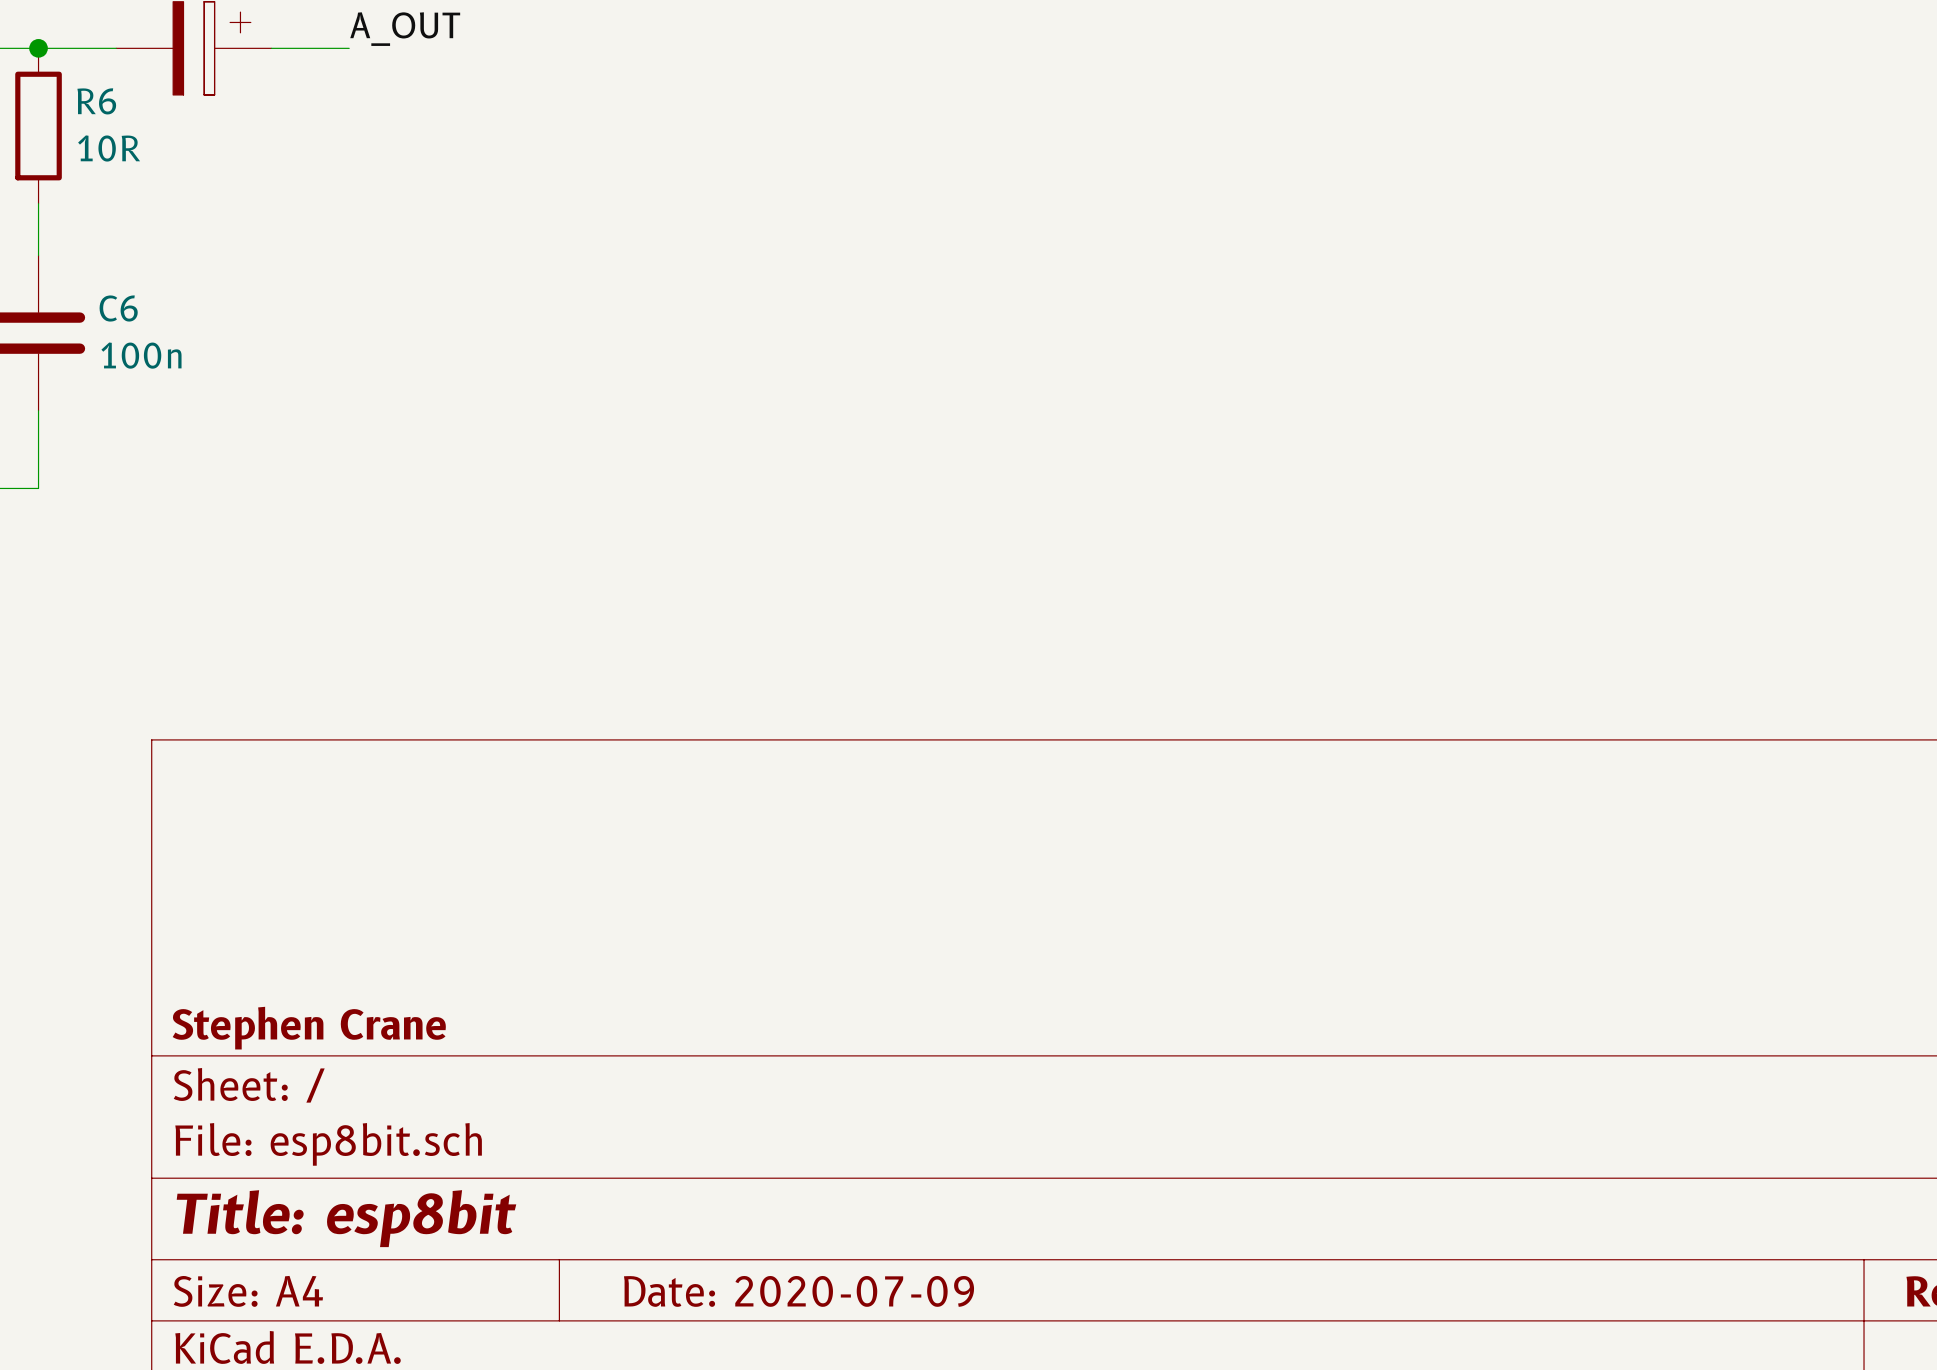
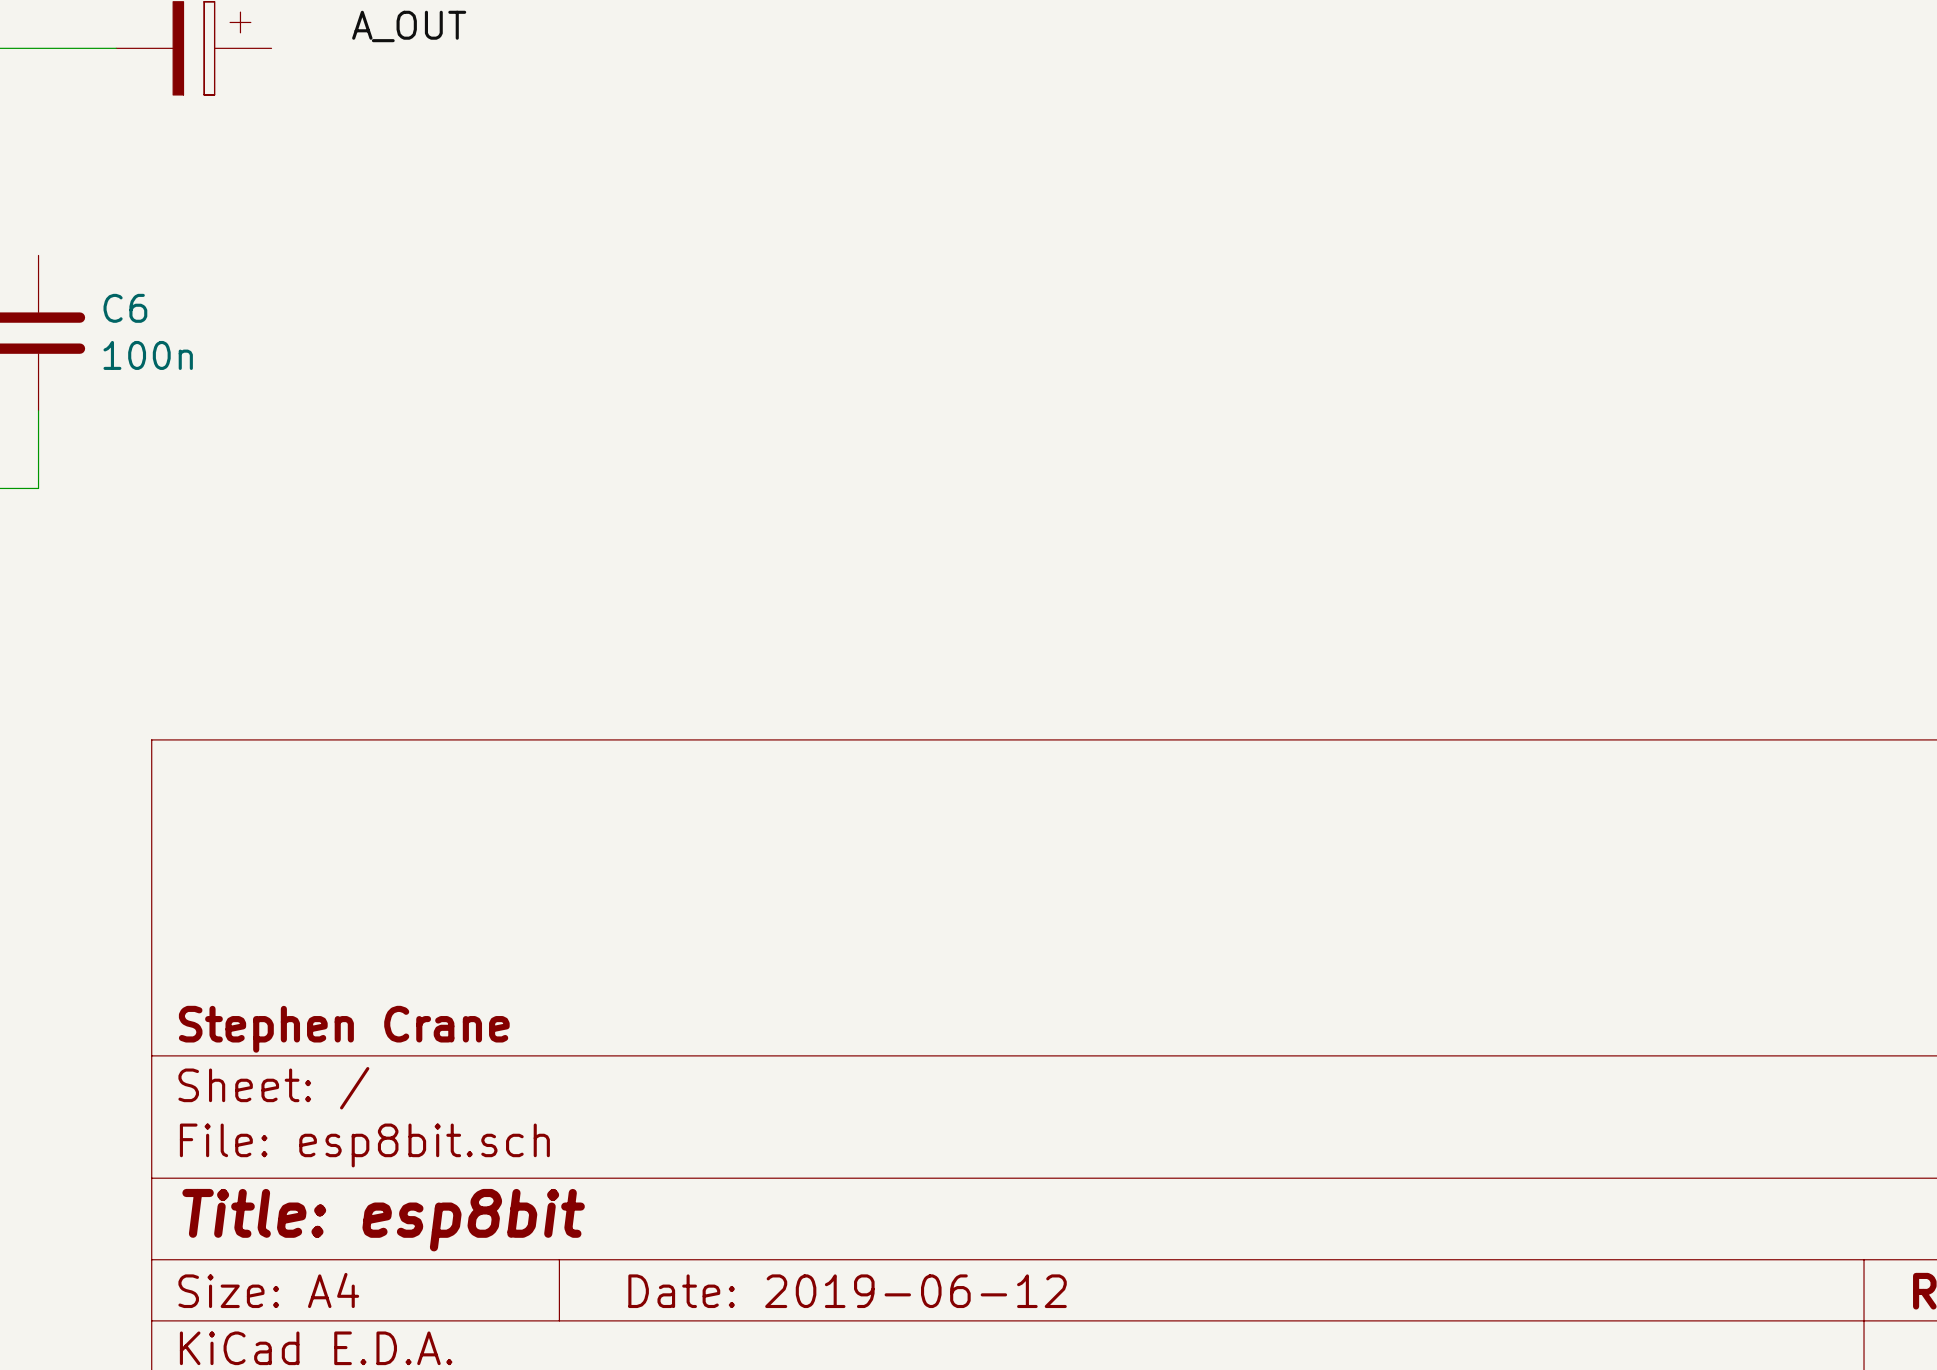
junction: (38, 48) -> none
wire: (271, 48) (349, 48) -> none
R6: 10R (38, 126) -> none
wire: (38, 203) (38, 255) -> none
title block: Date: 2020-07-09 (799, 1291) -> Date: 2019-06-12 (847, 1291)

